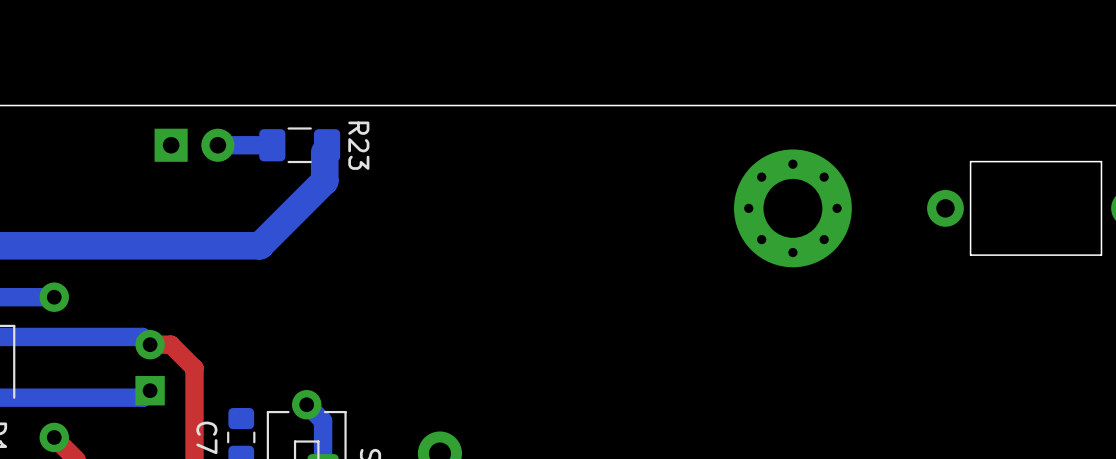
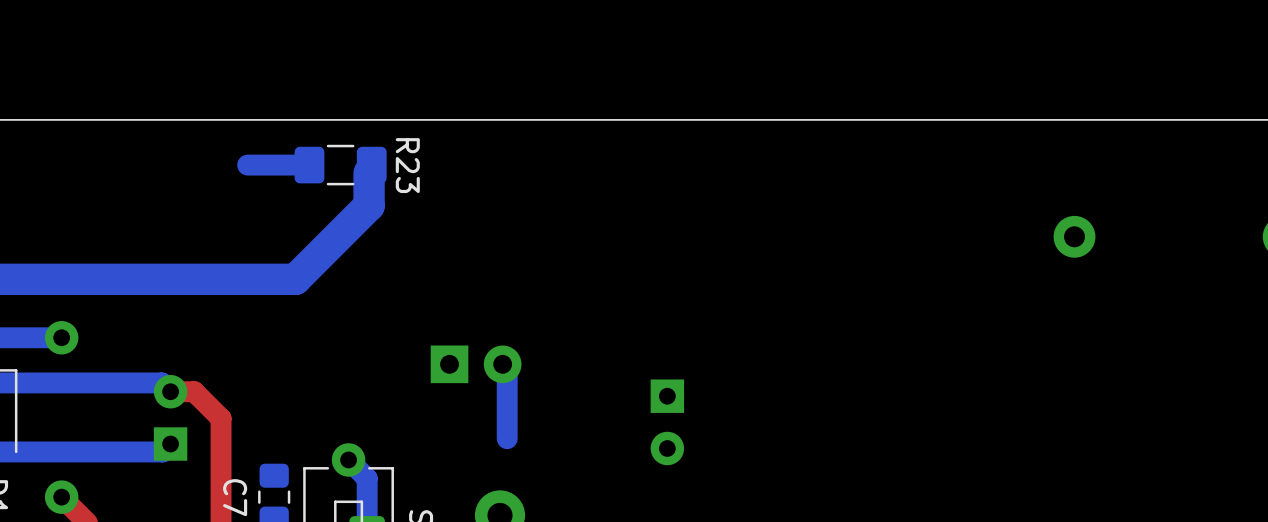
part position: (194, 145) -> (476, 364)
board edge: (1101, 161) (970, 161) (970, 255) (1101, 255) (1101, 161) -> none
part: (792, 208) -> none
bottom track: none -> (502, 364) (507, 368) (507, 438)
part: none -> (667, 422)

